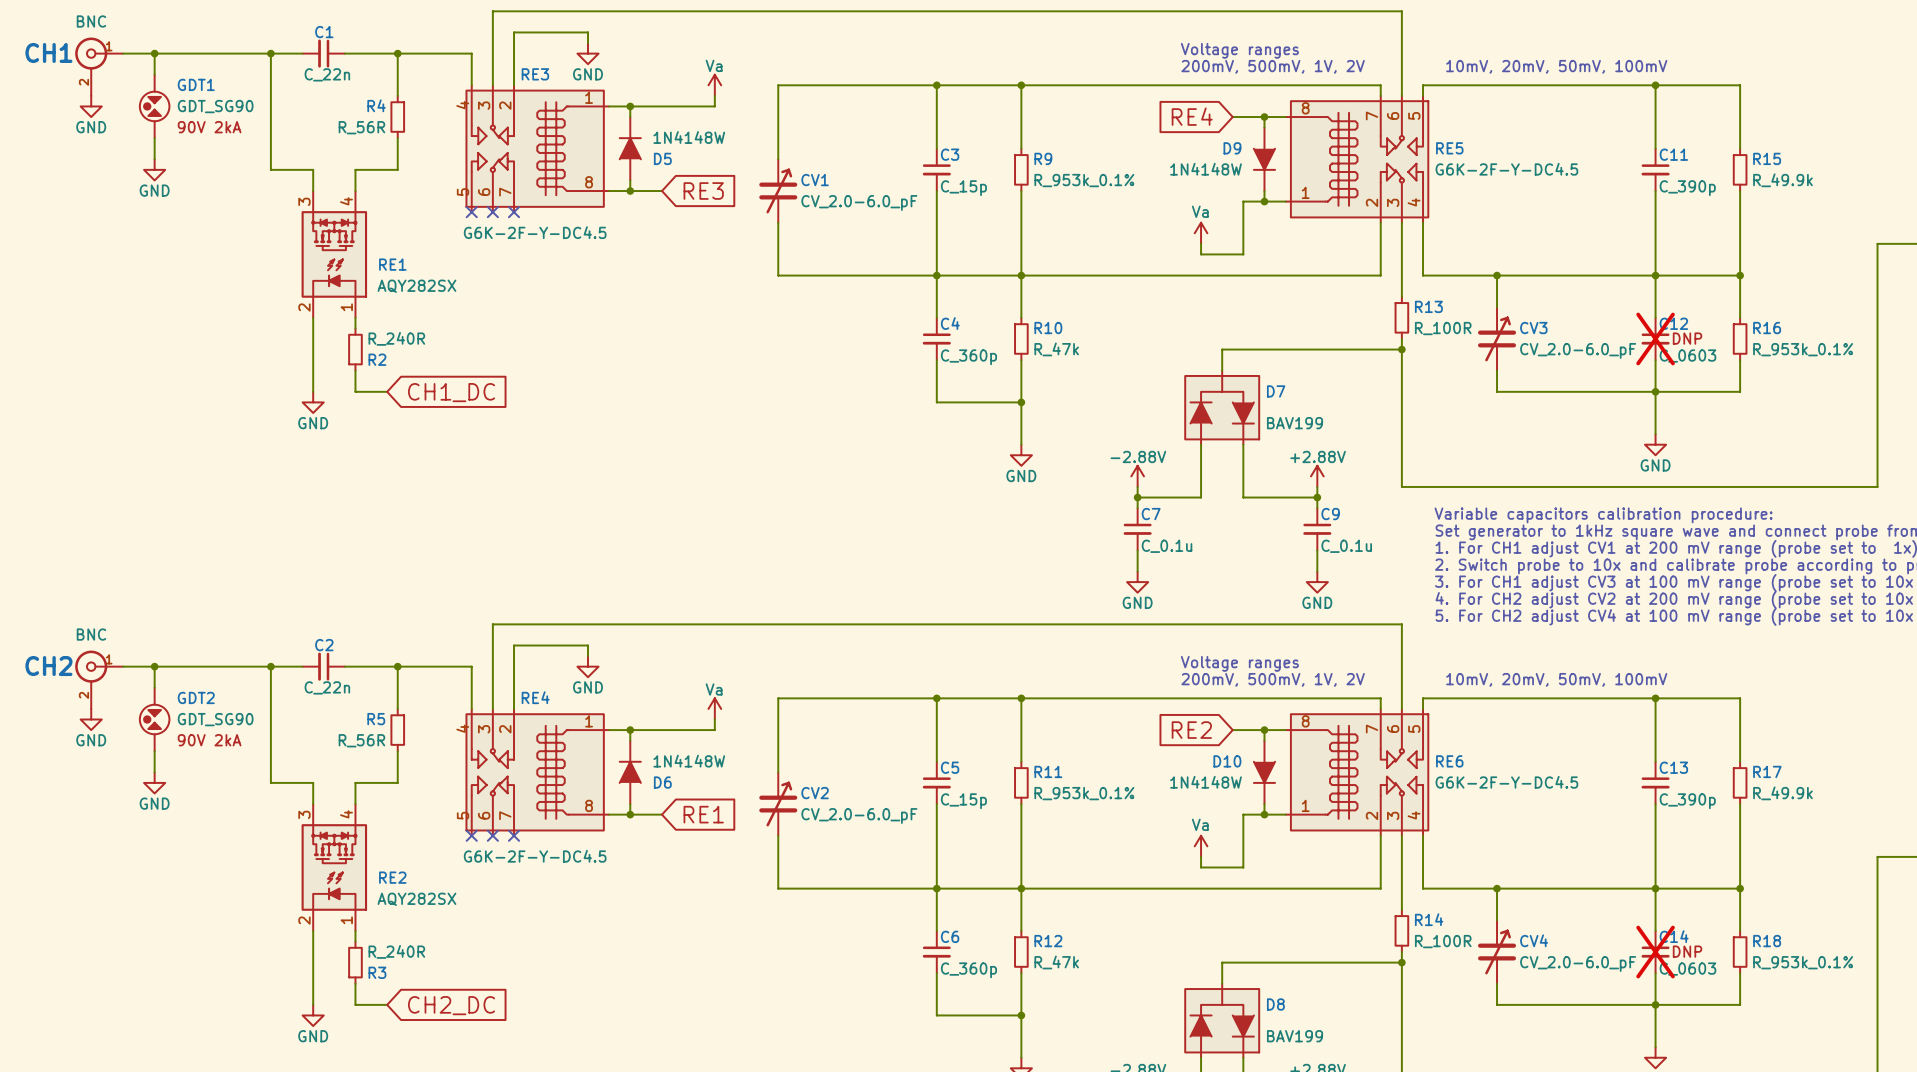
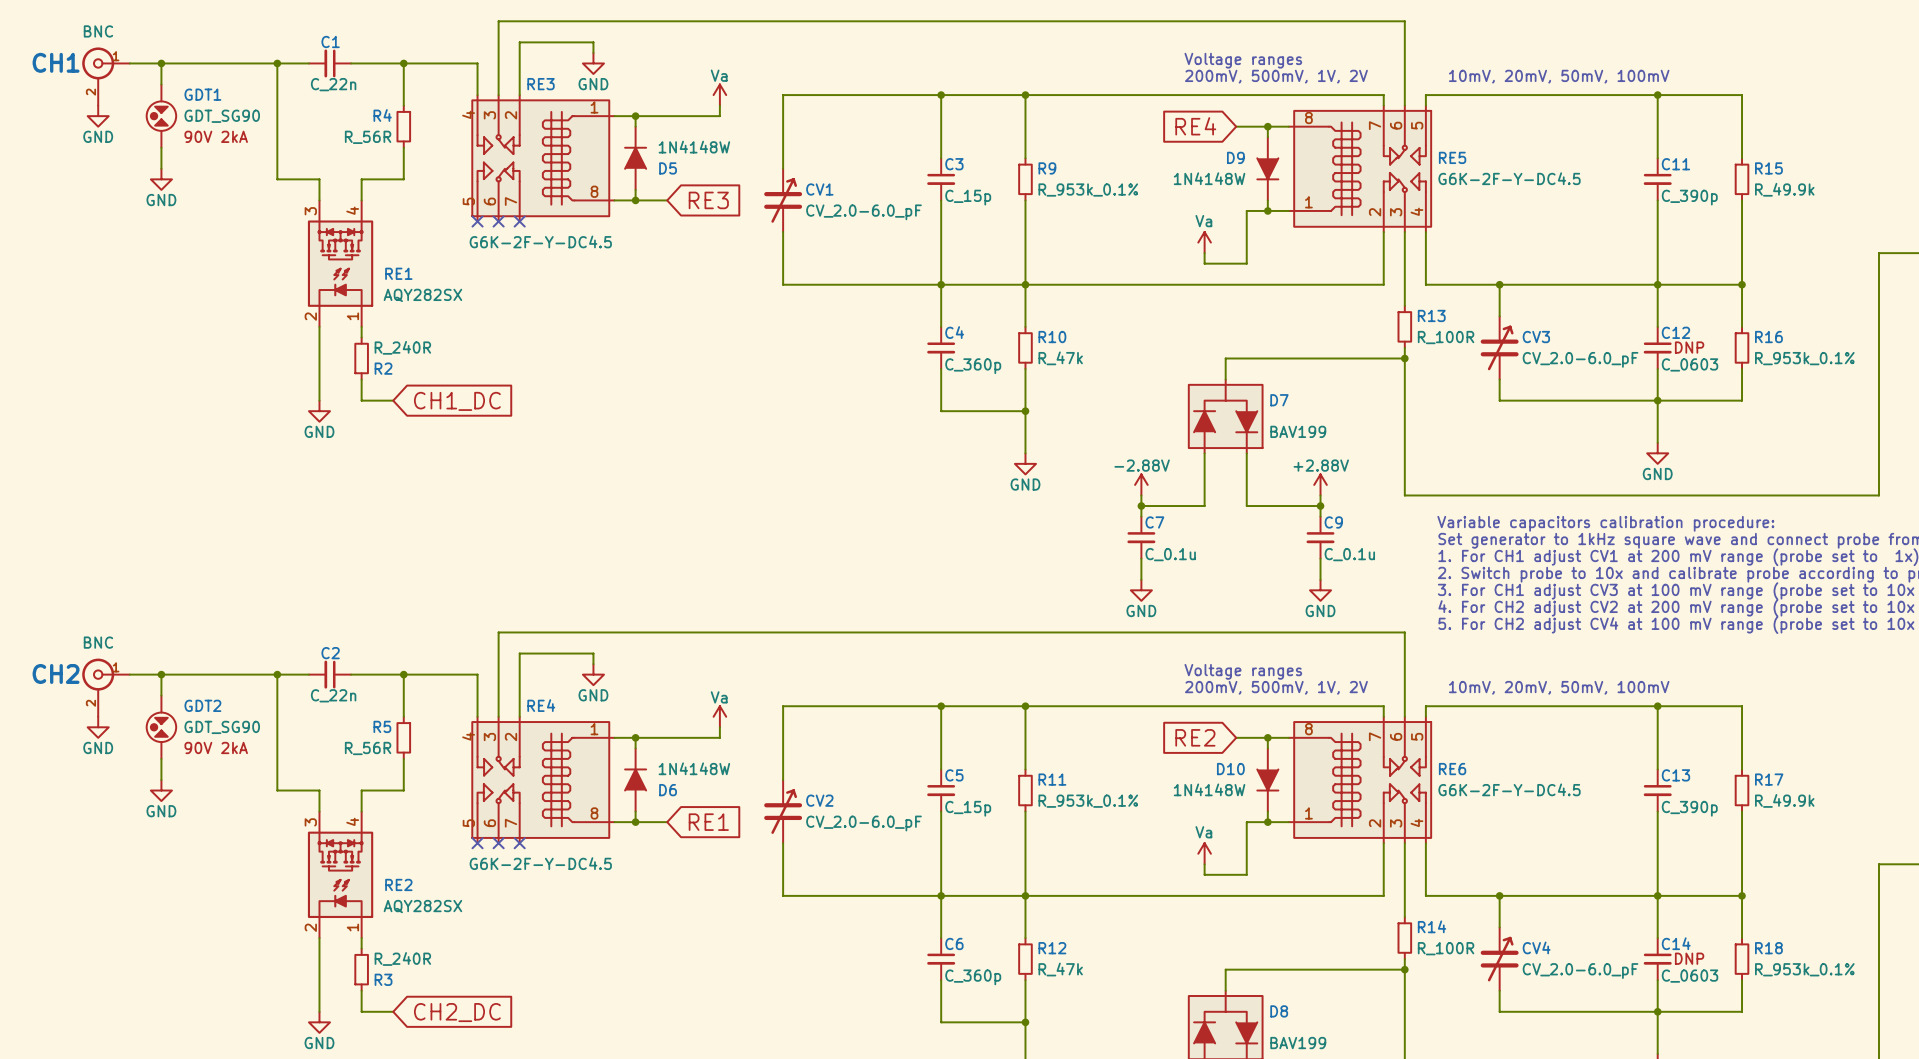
C12 do-not-place cross: (1655, 338) -> none
C14 do-not-place cross: (1655, 952) -> none

